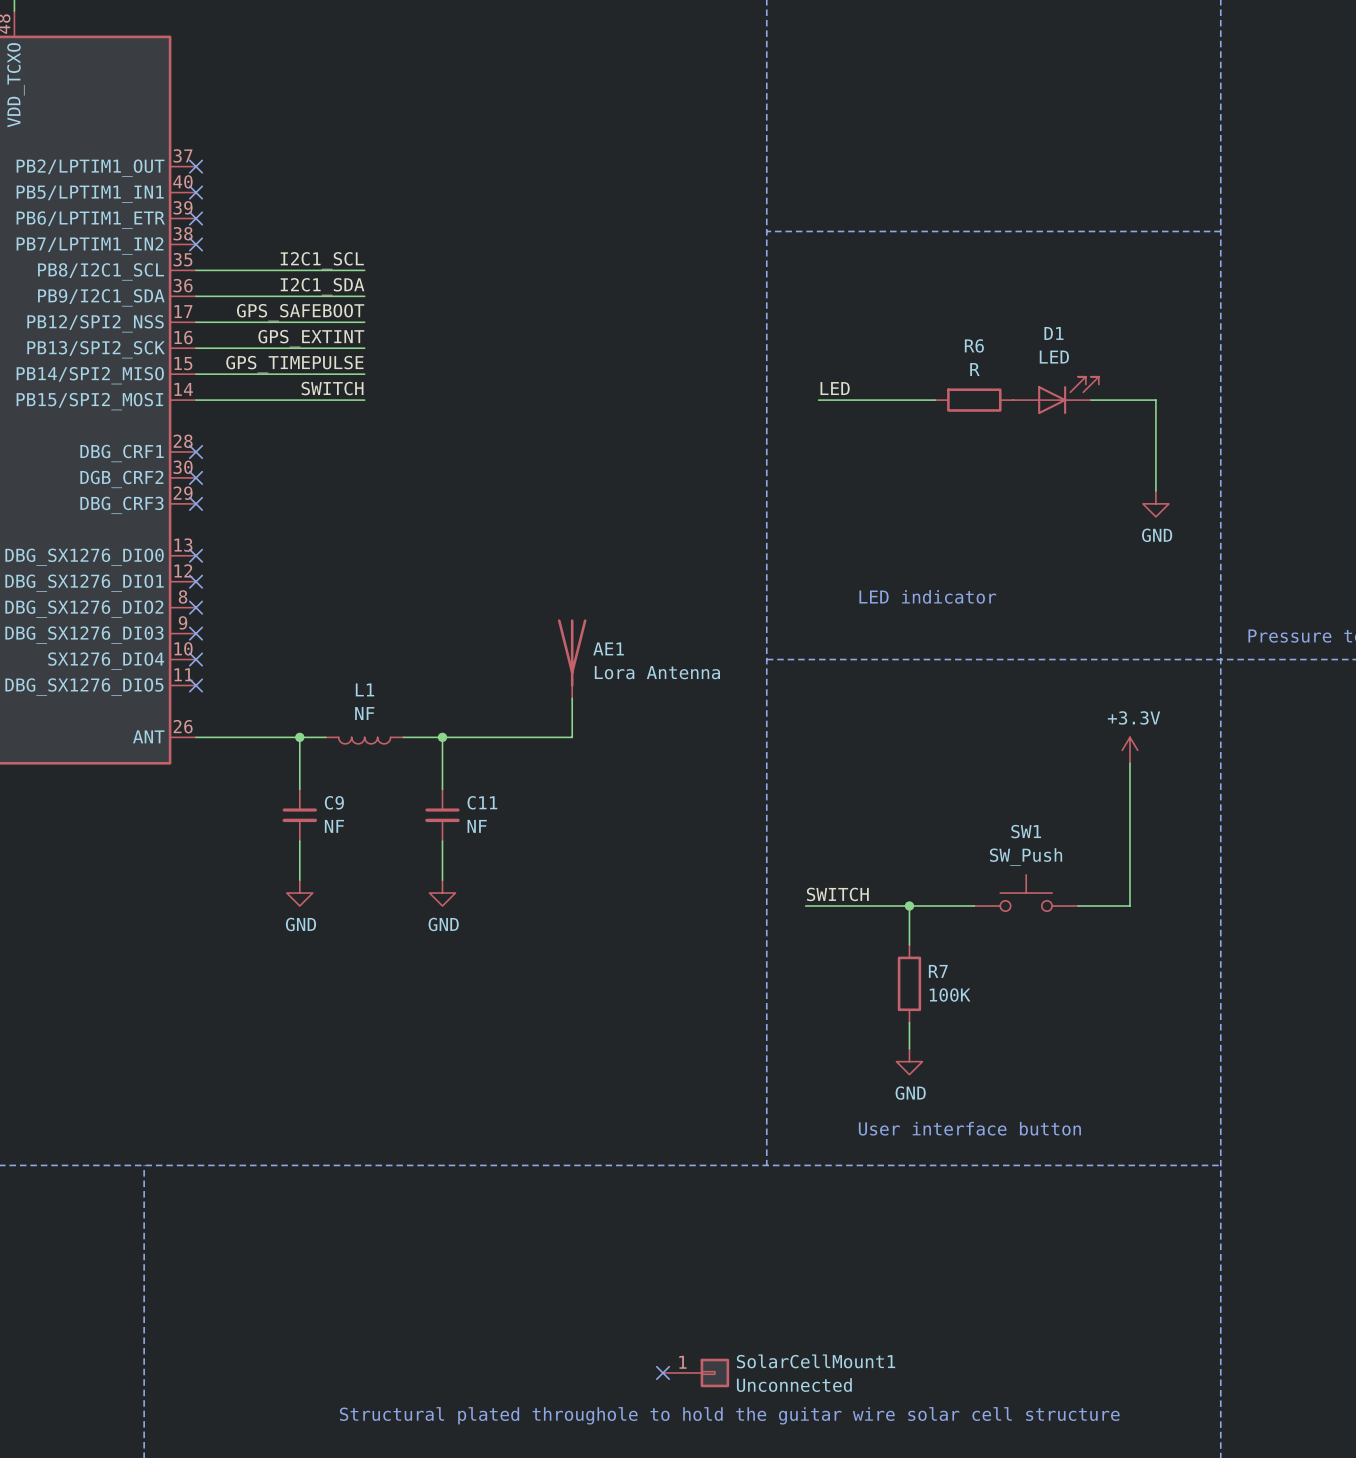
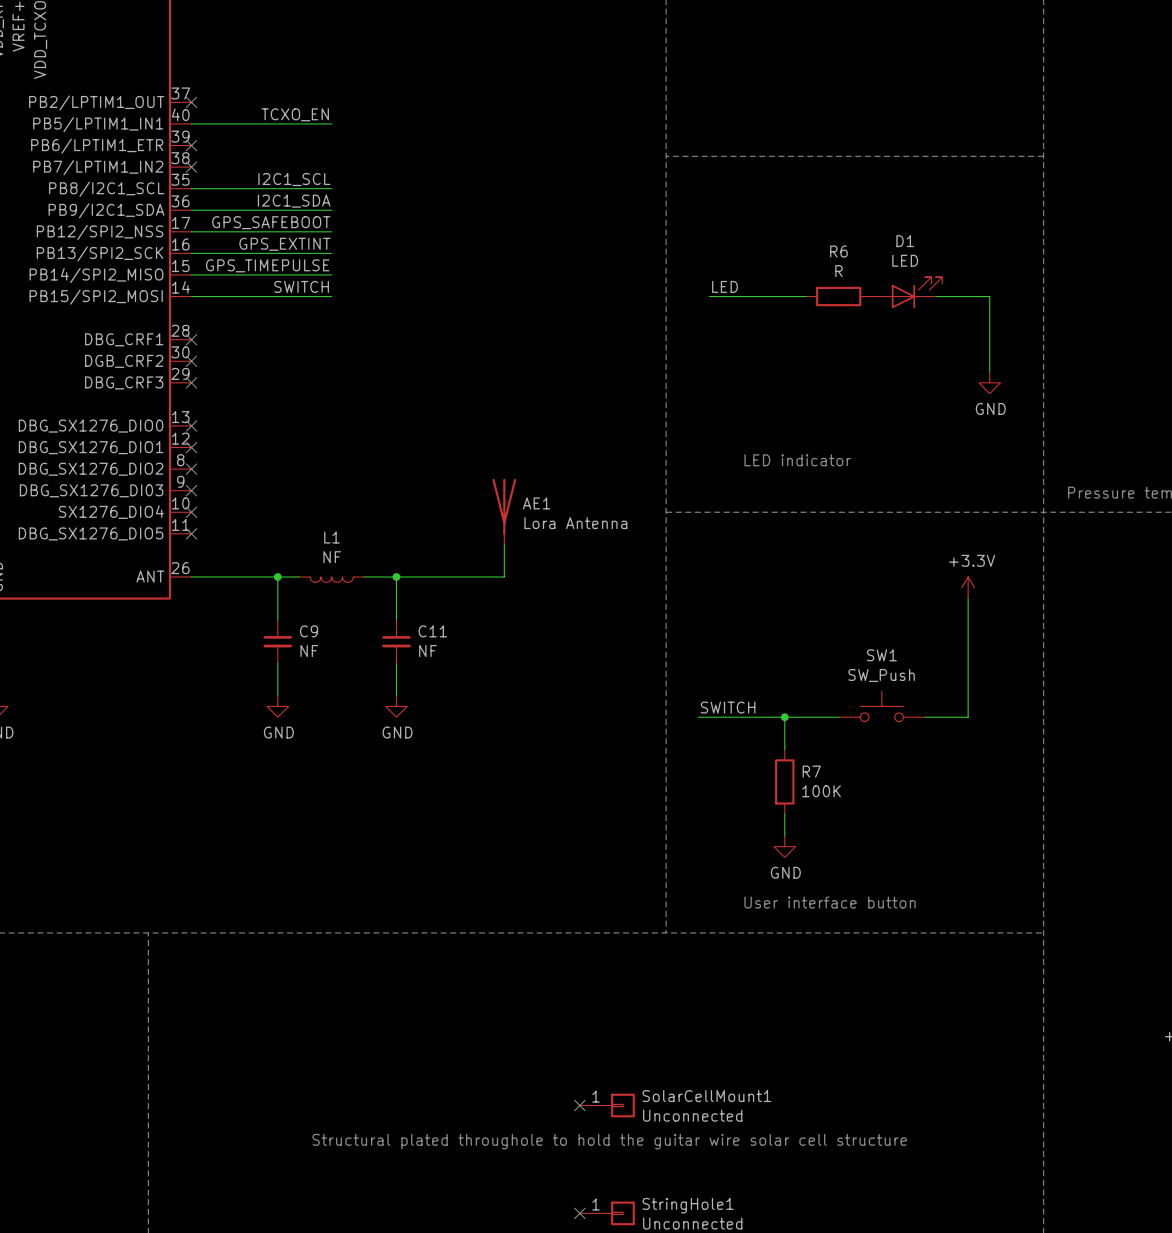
label: none -> TCXO_EN (295, 114)
wire: none -> (191, 123) (331, 123)
no-connect mark: (196, 192) -> none

